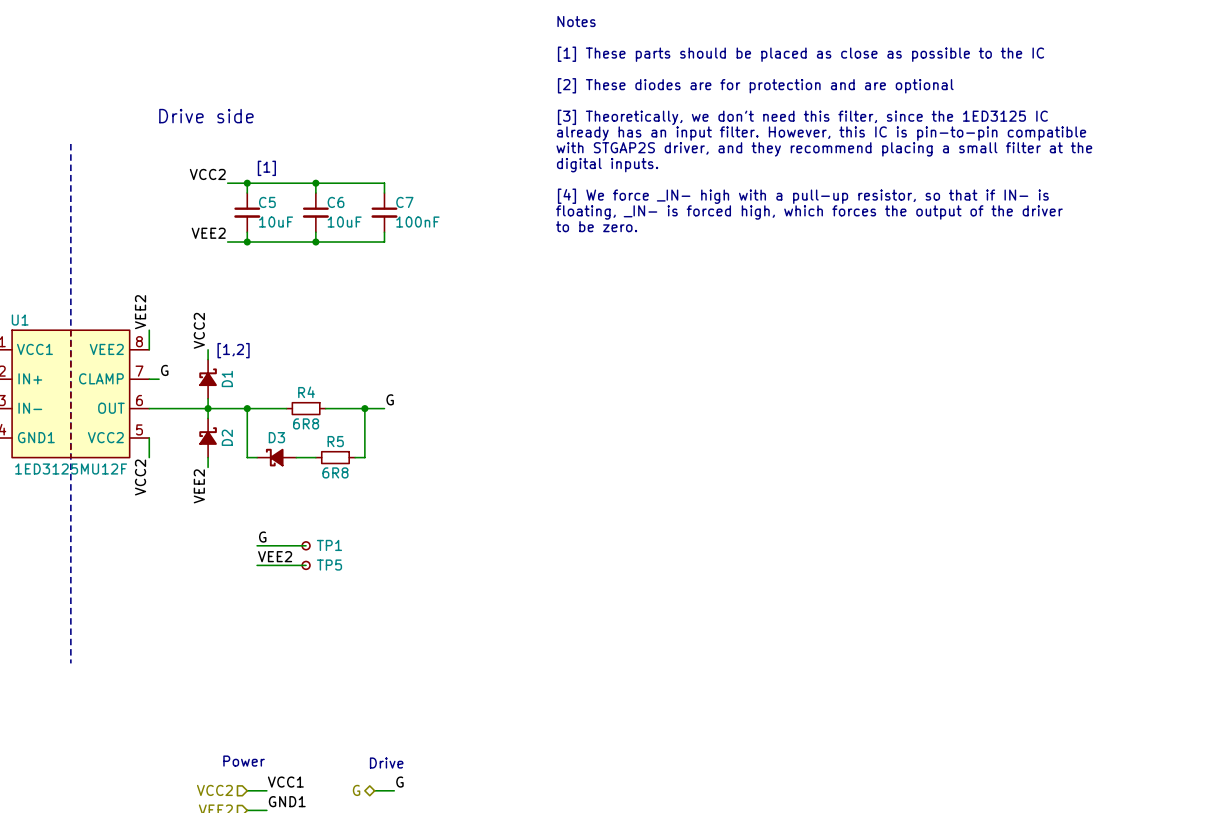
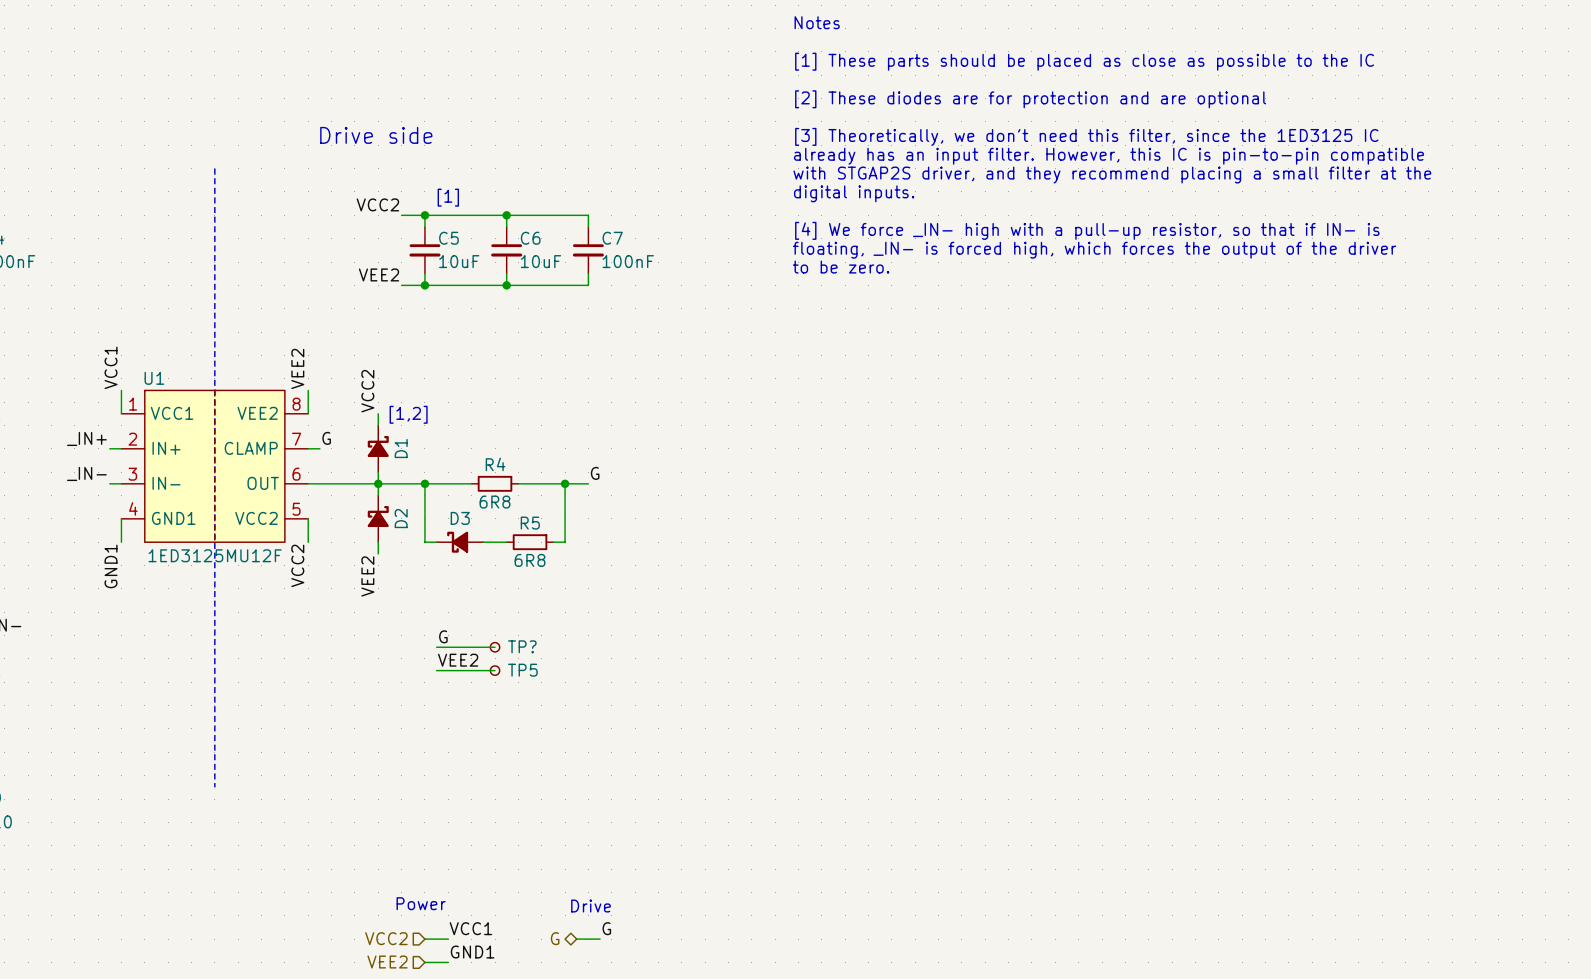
TP1 name: TP1 (329, 545) -> TP? (522, 646)

